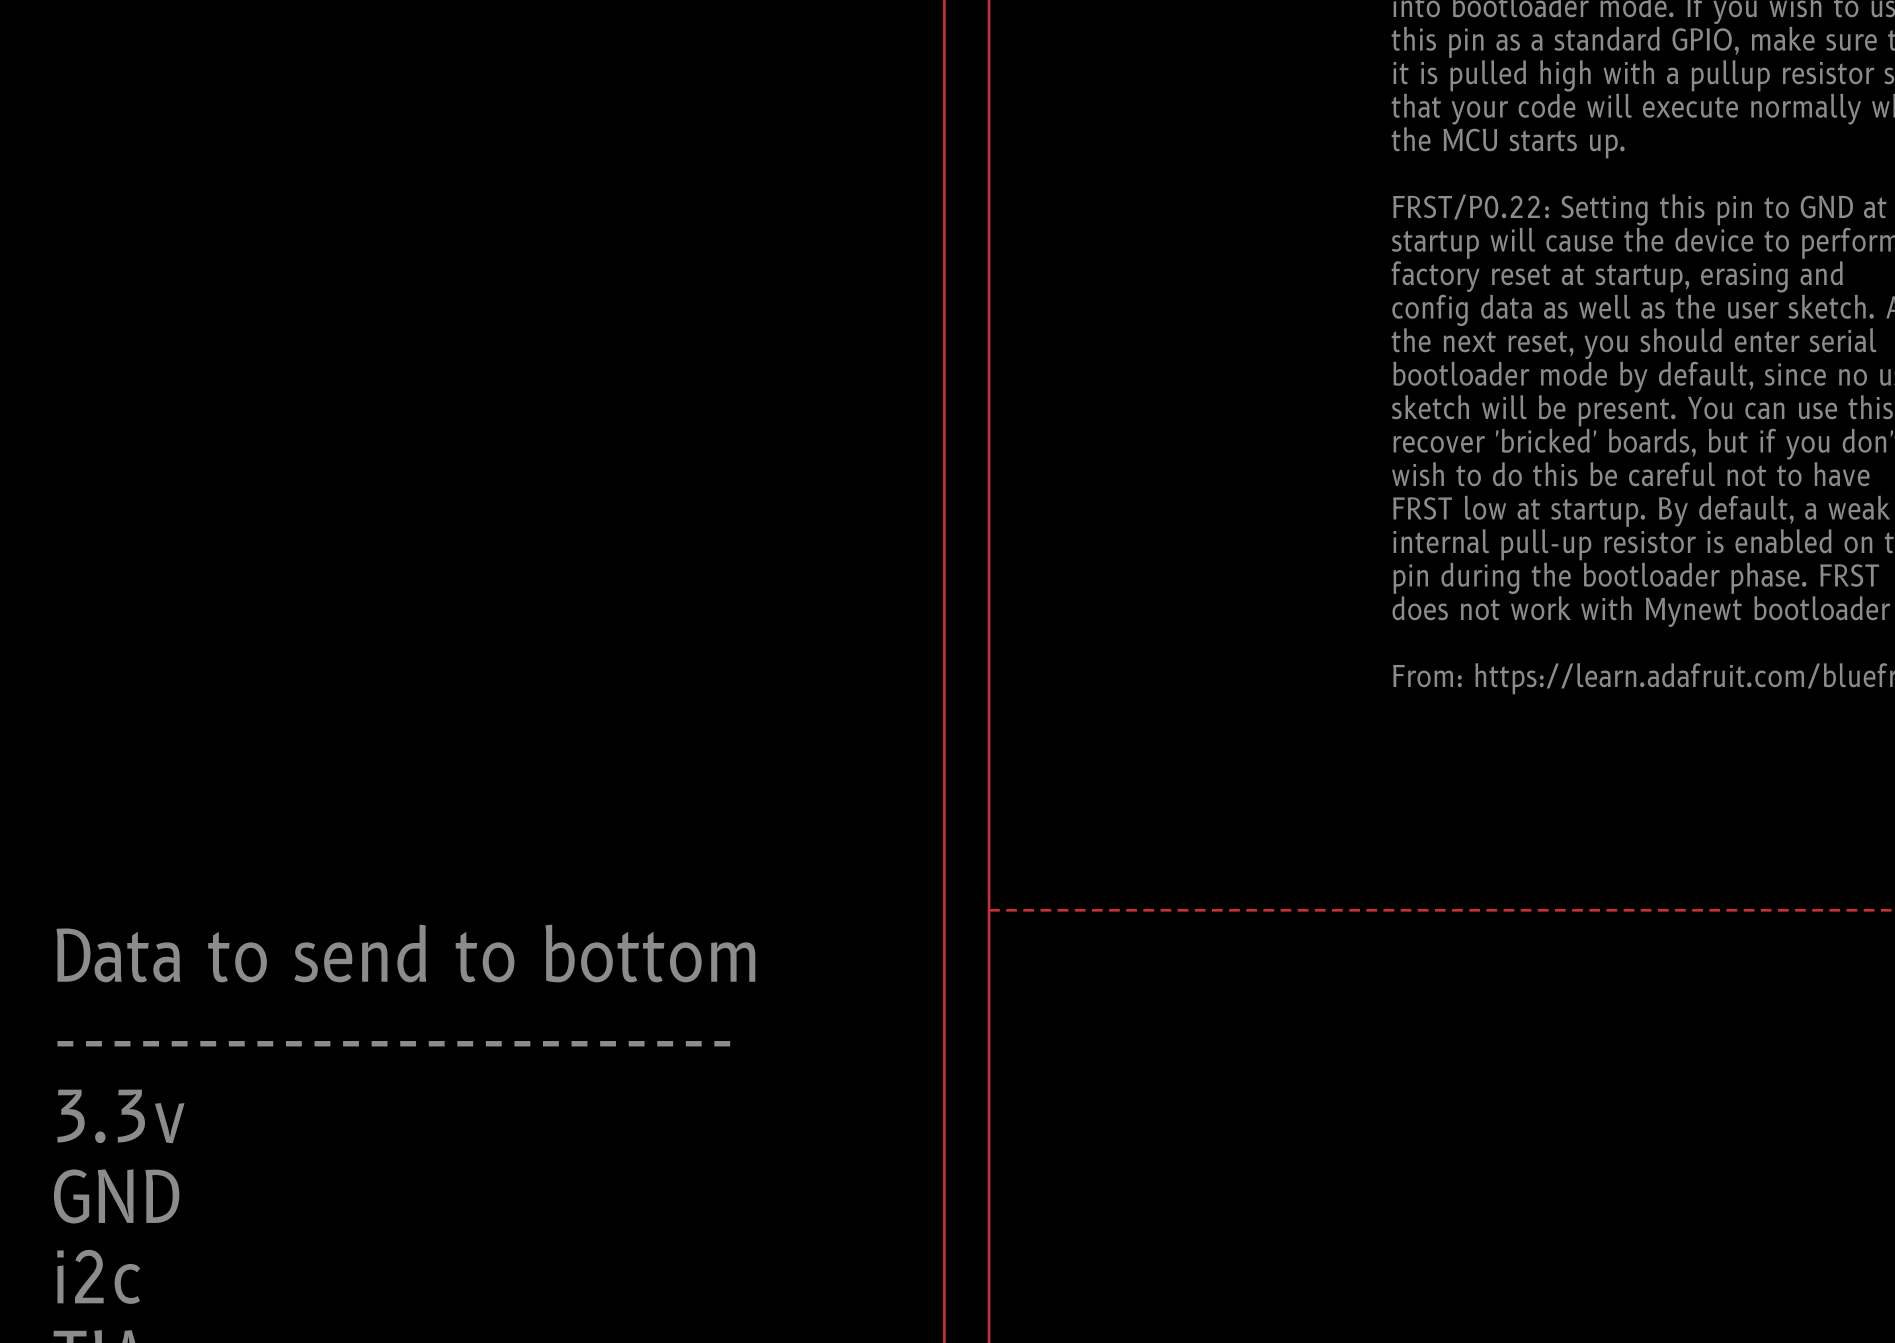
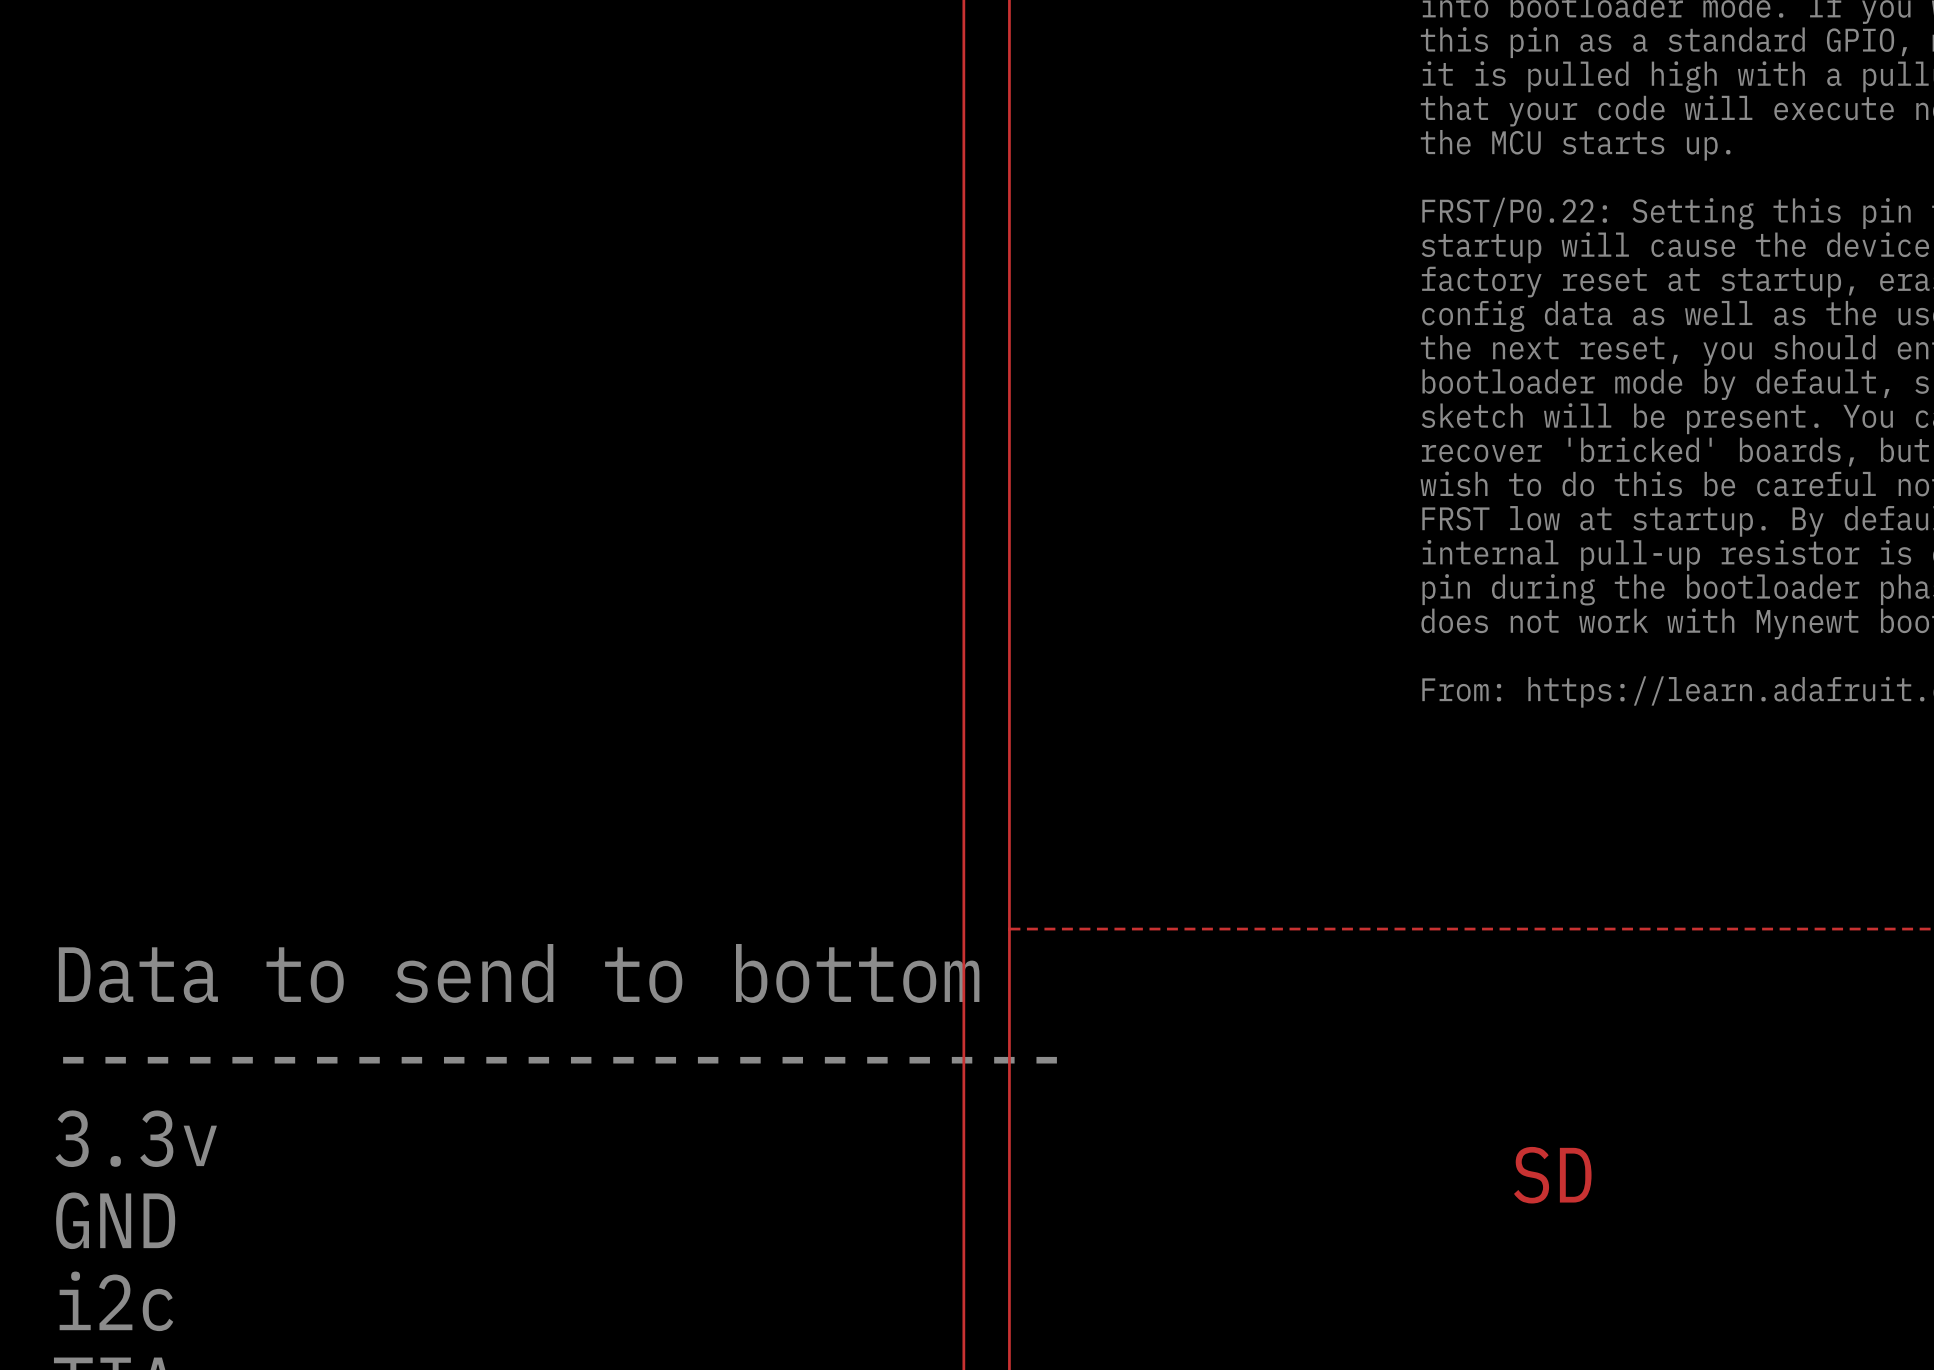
text: none -> SD (1552, 1175)

